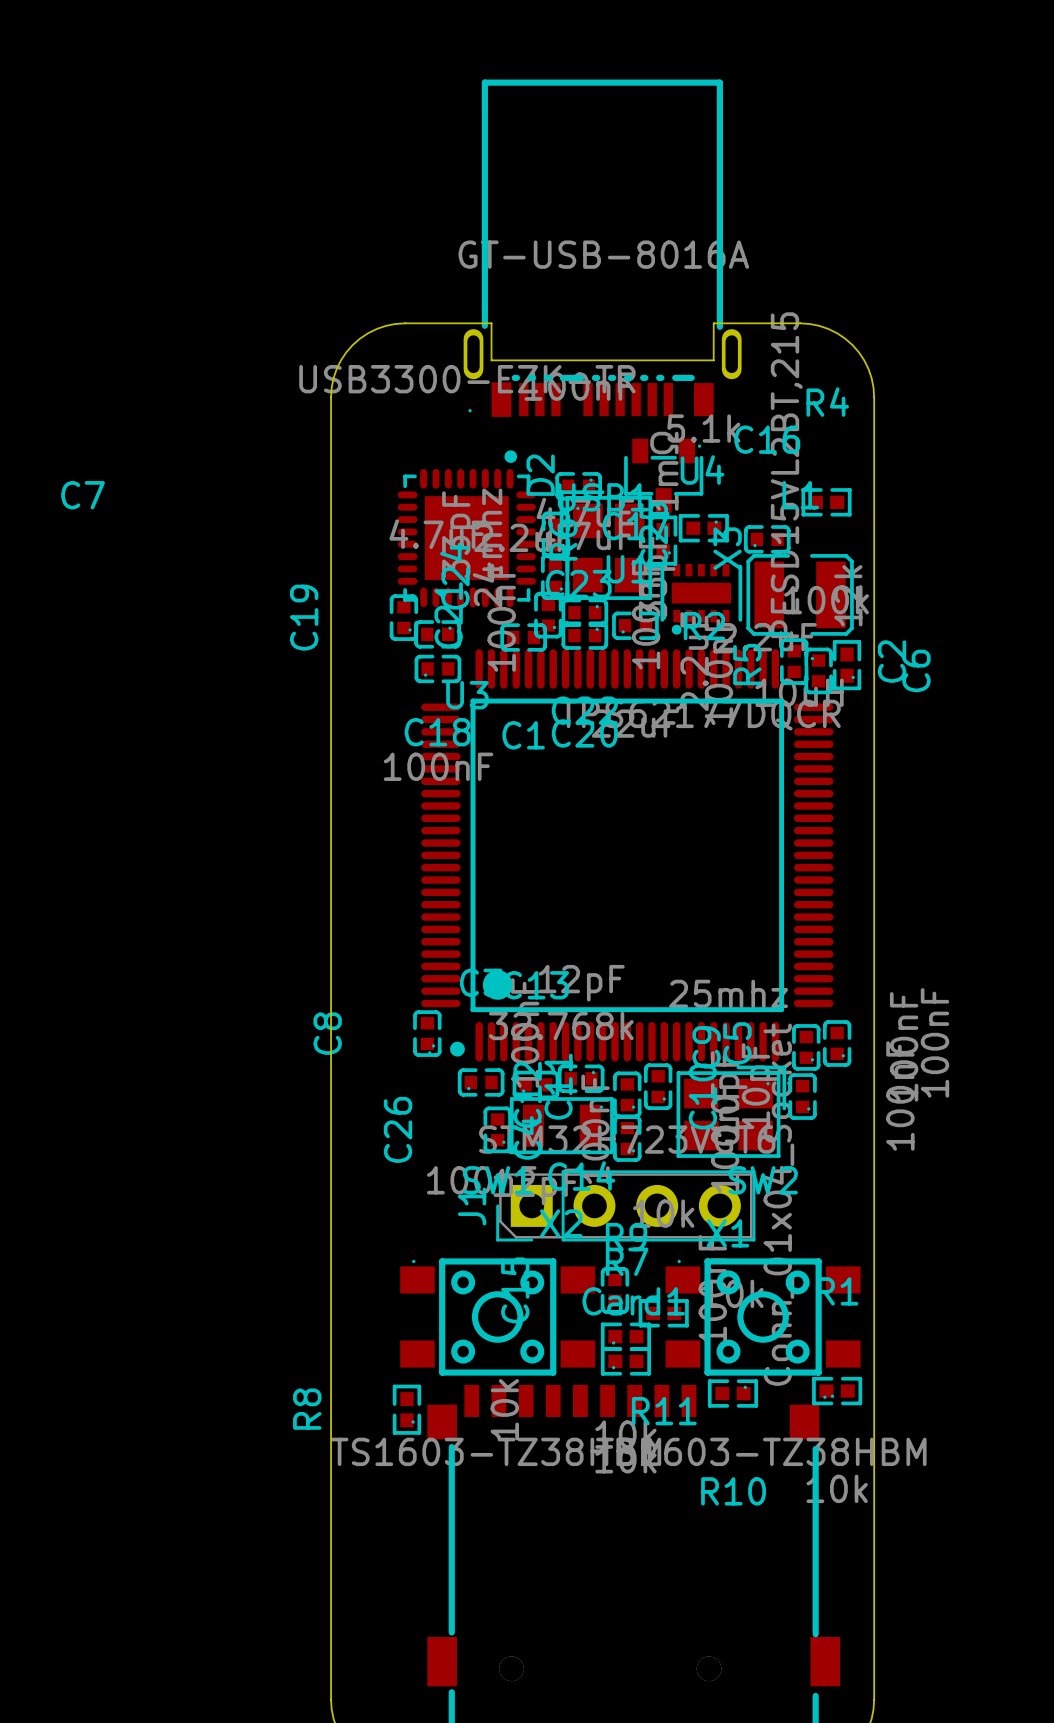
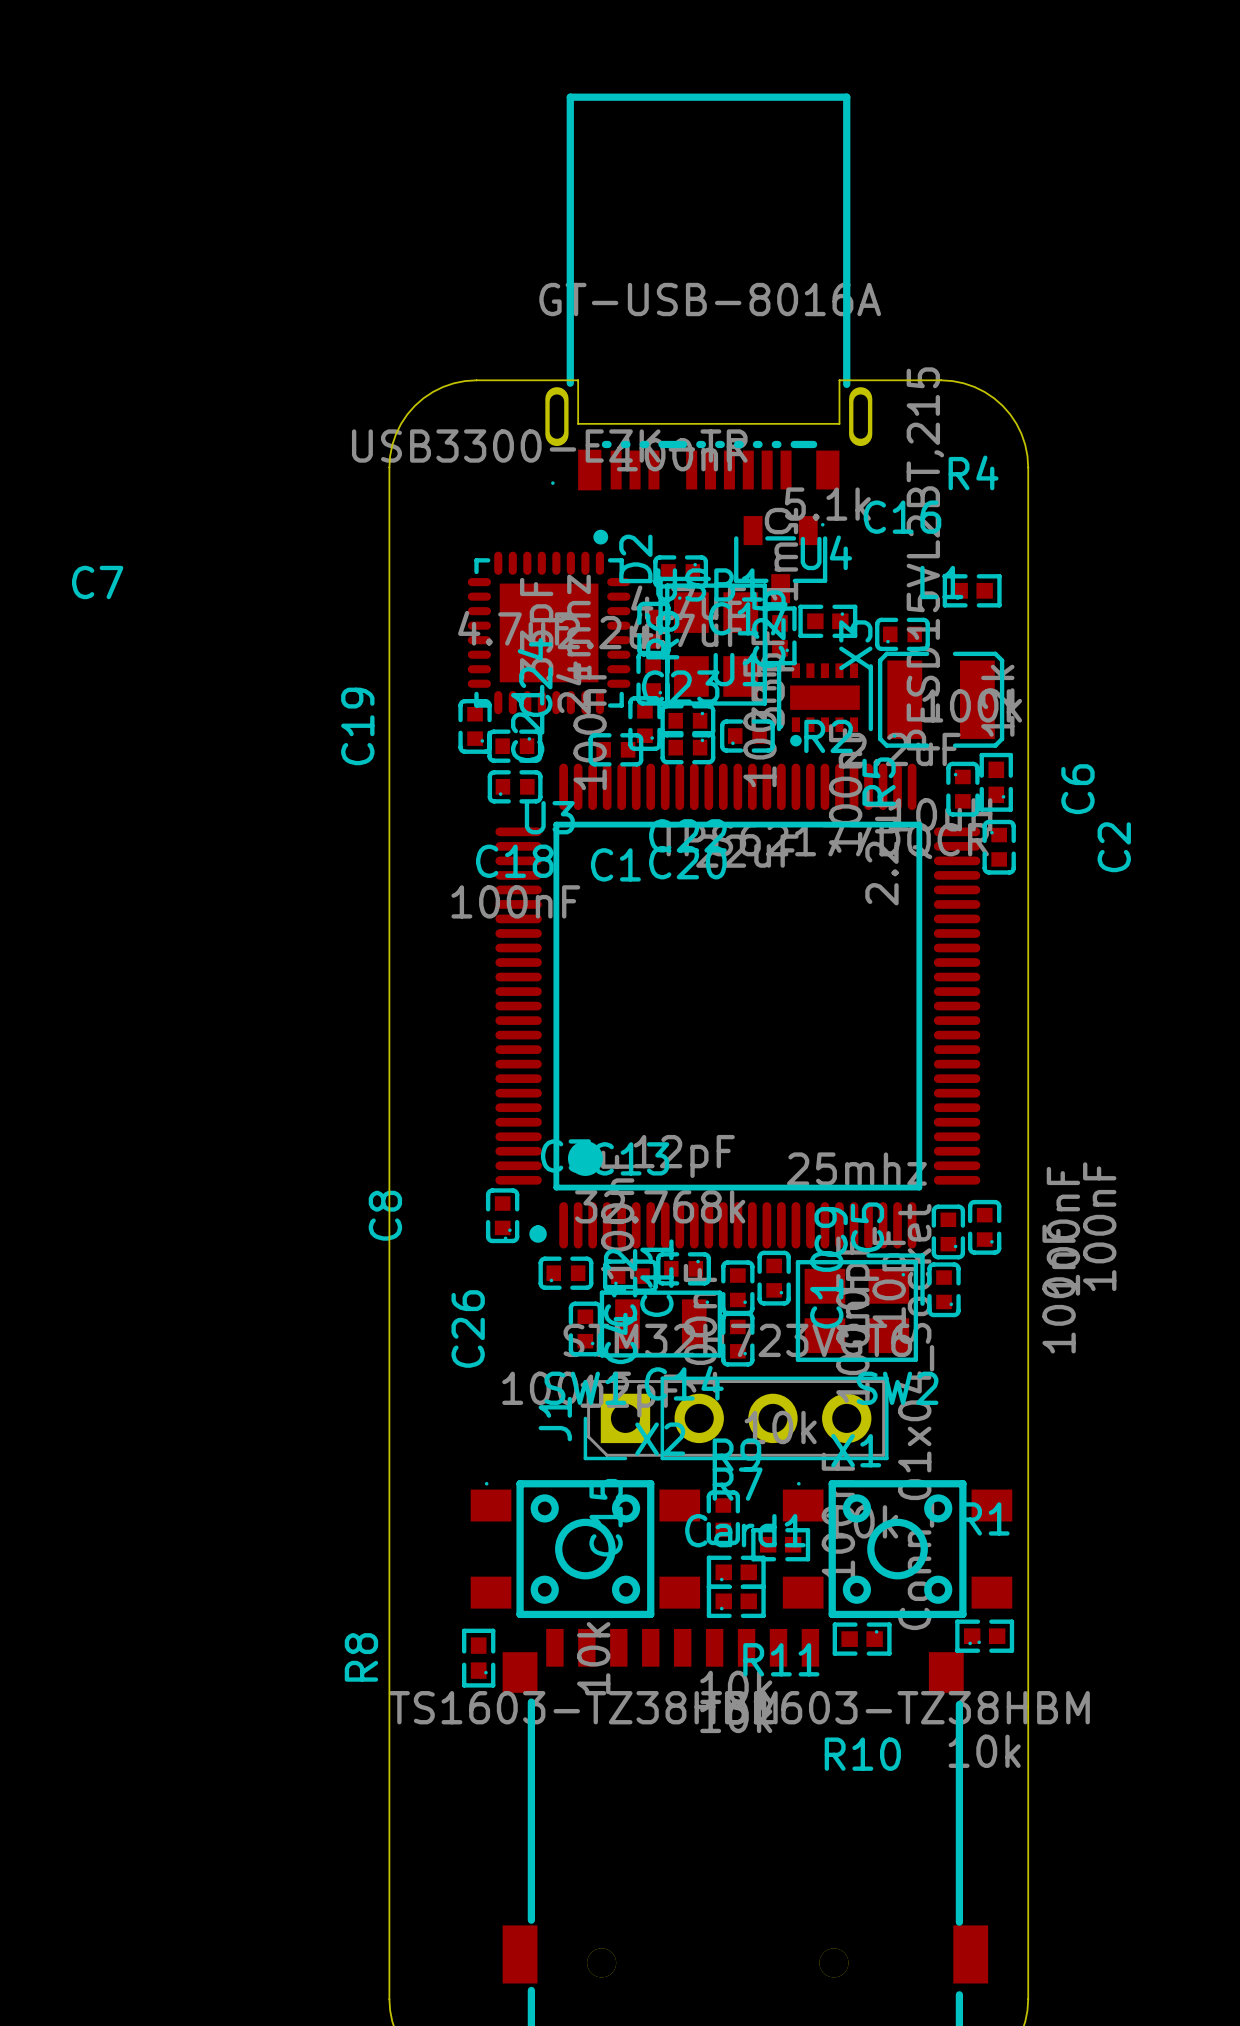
C2 position: (794, 661) -> (999, 847)

